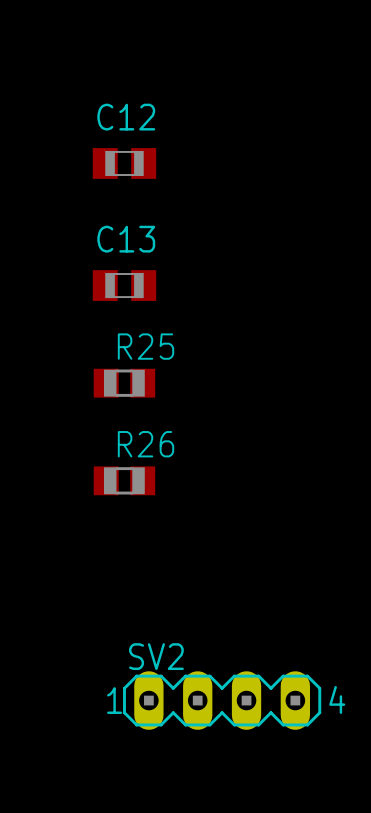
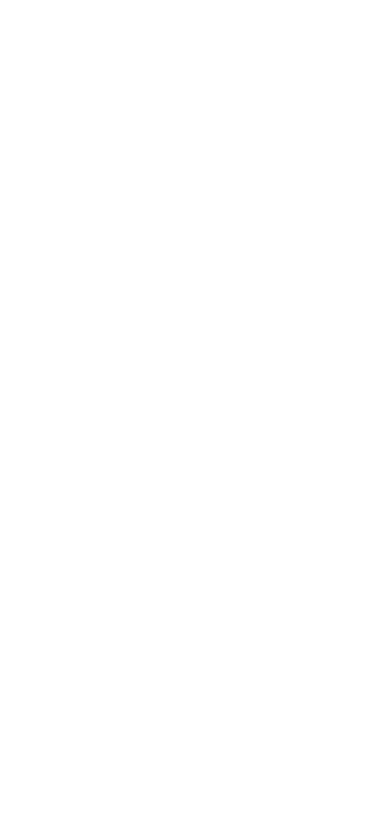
C12: (124, 163) -> none
C13: (124, 285) -> none
R25: (124, 383) -> none
R26: (124, 480) -> none
SV2: (222, 700) -> none

